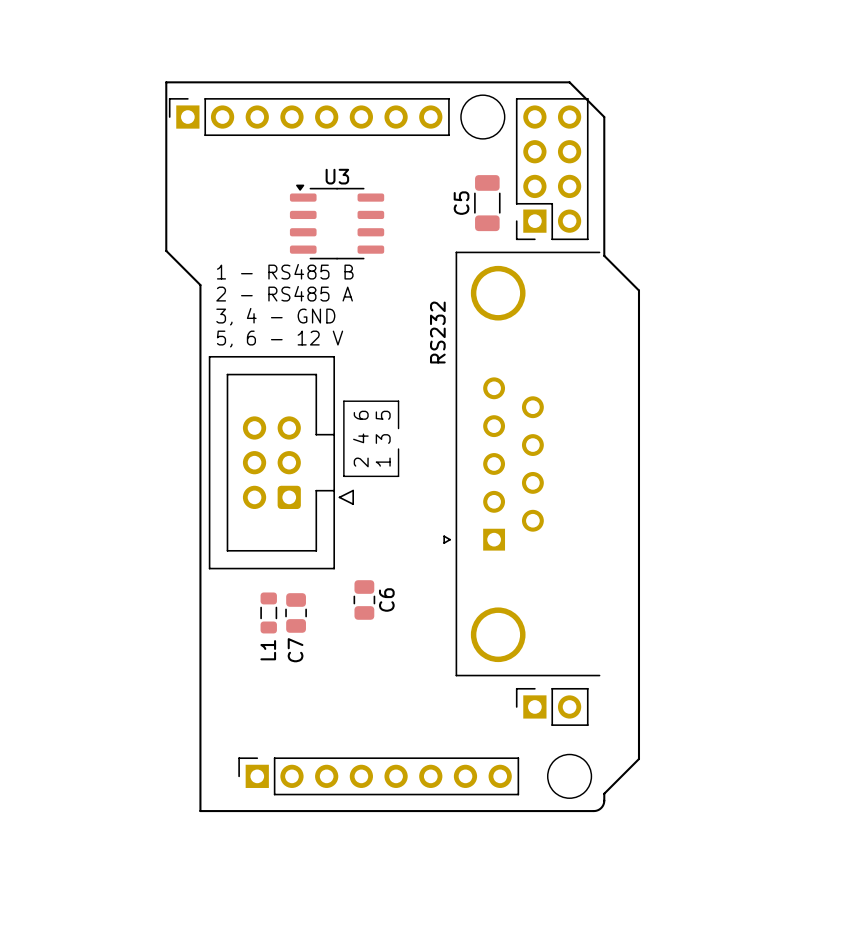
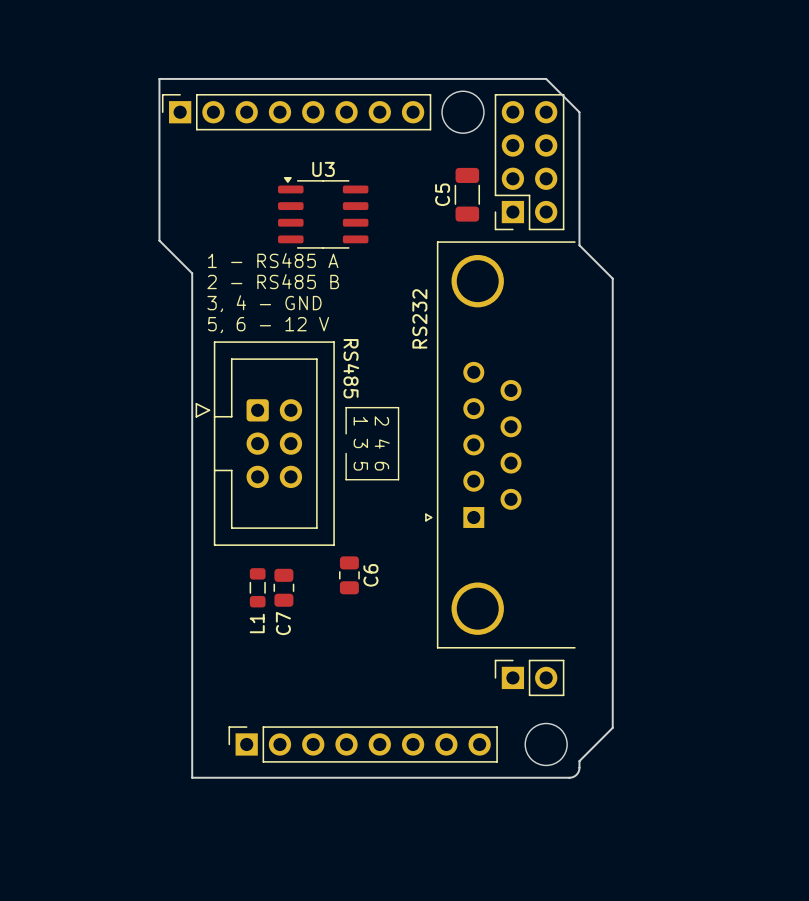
text: 1 - RS485 B (285, 271) -> 1 - RS485 A (273, 260)
text: 2 - RS485 A (284, 293) -> 2 - RS485 B (273, 281)
text: none -> RS485 (351, 368)
line: (398, 428) (398, 401) (343, 401) (343, 476) (398, 476) (398, 449) -> none
text rotation: 0° (383, 438) -> 180° (360, 443)
text rotation: 0° (360, 439) -> 180° (382, 443)
line: none -> (346, 433) (346, 407) (398, 407) (398, 479) (346, 479) (346, 453)
part rotation: 0° (281, 462) -> 180° (265, 443)

